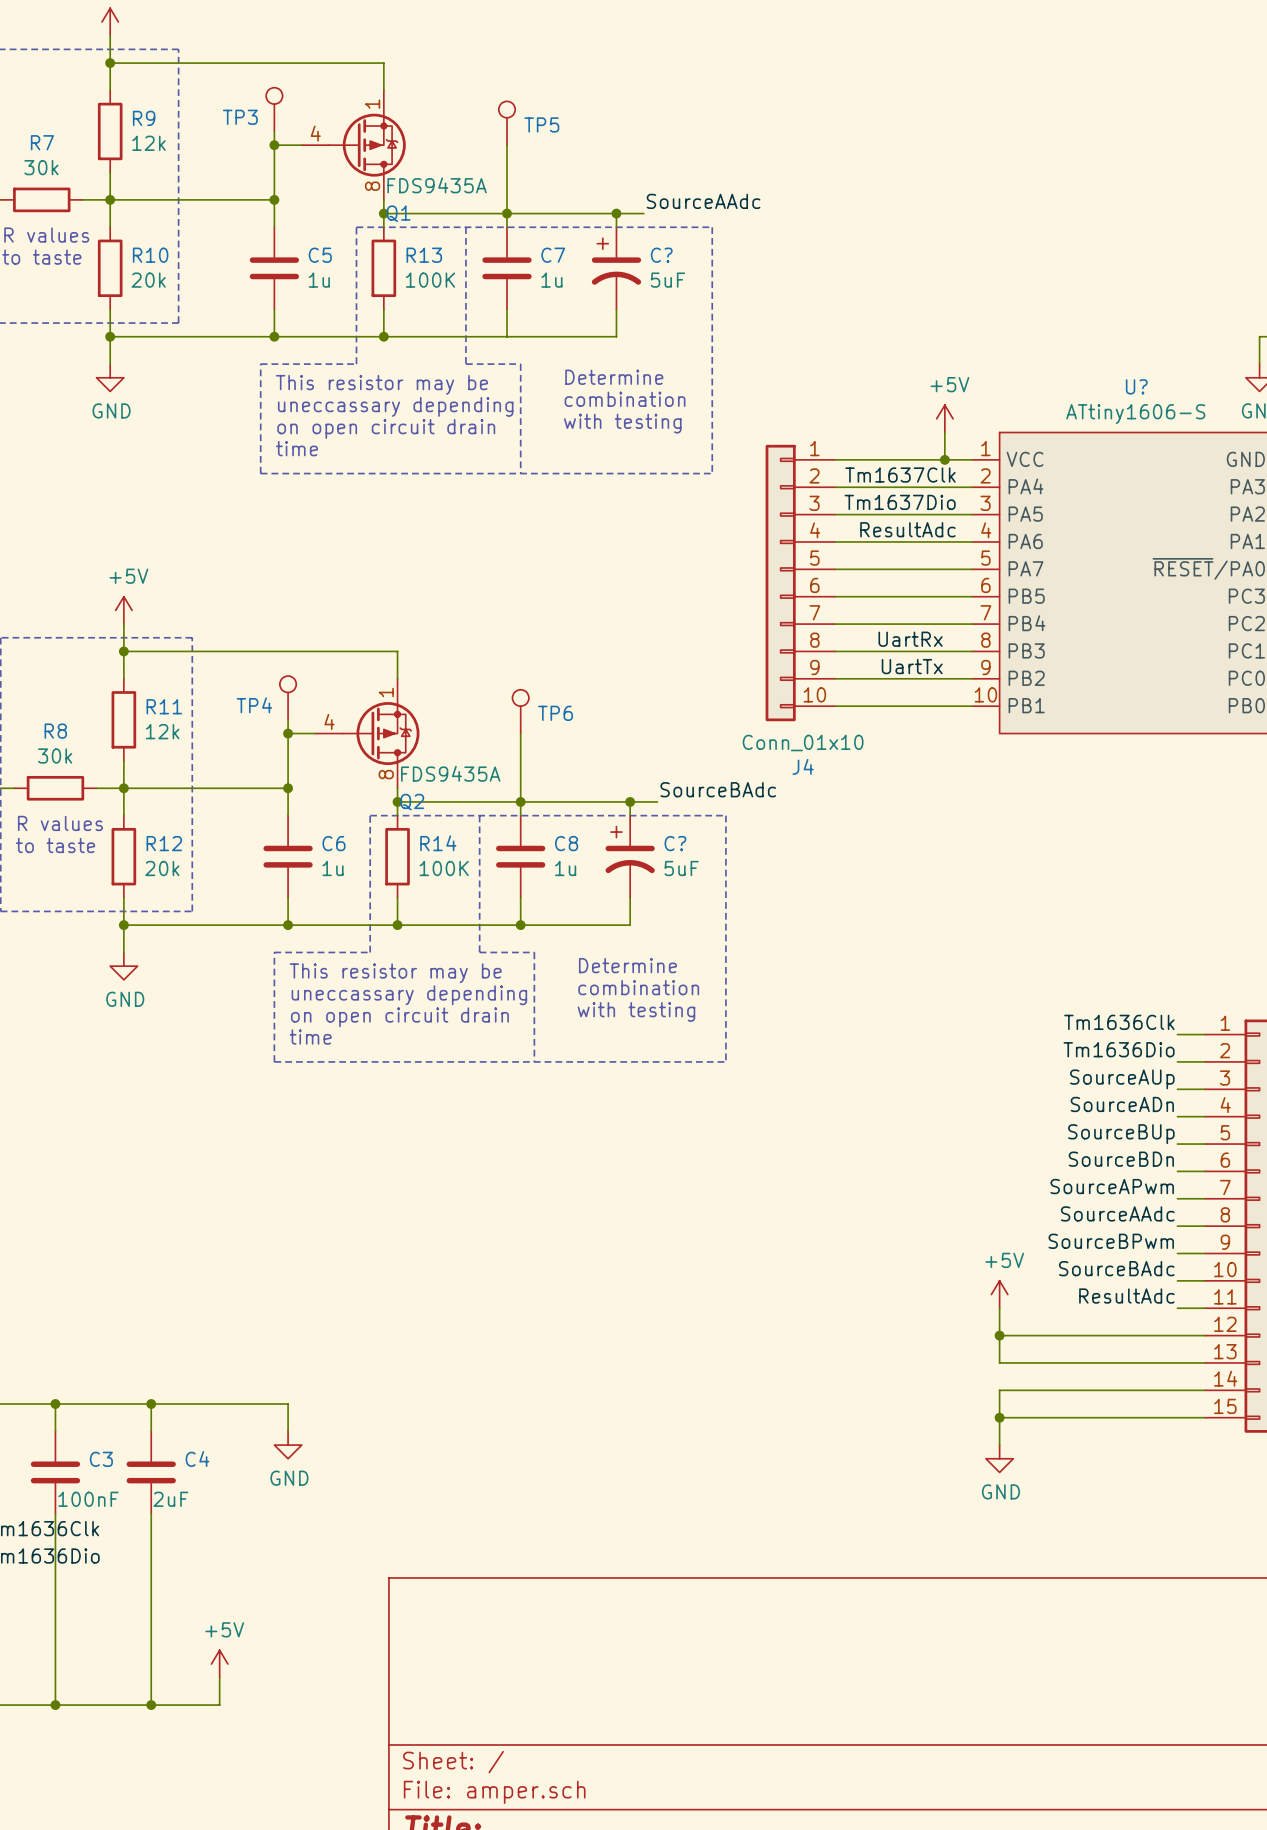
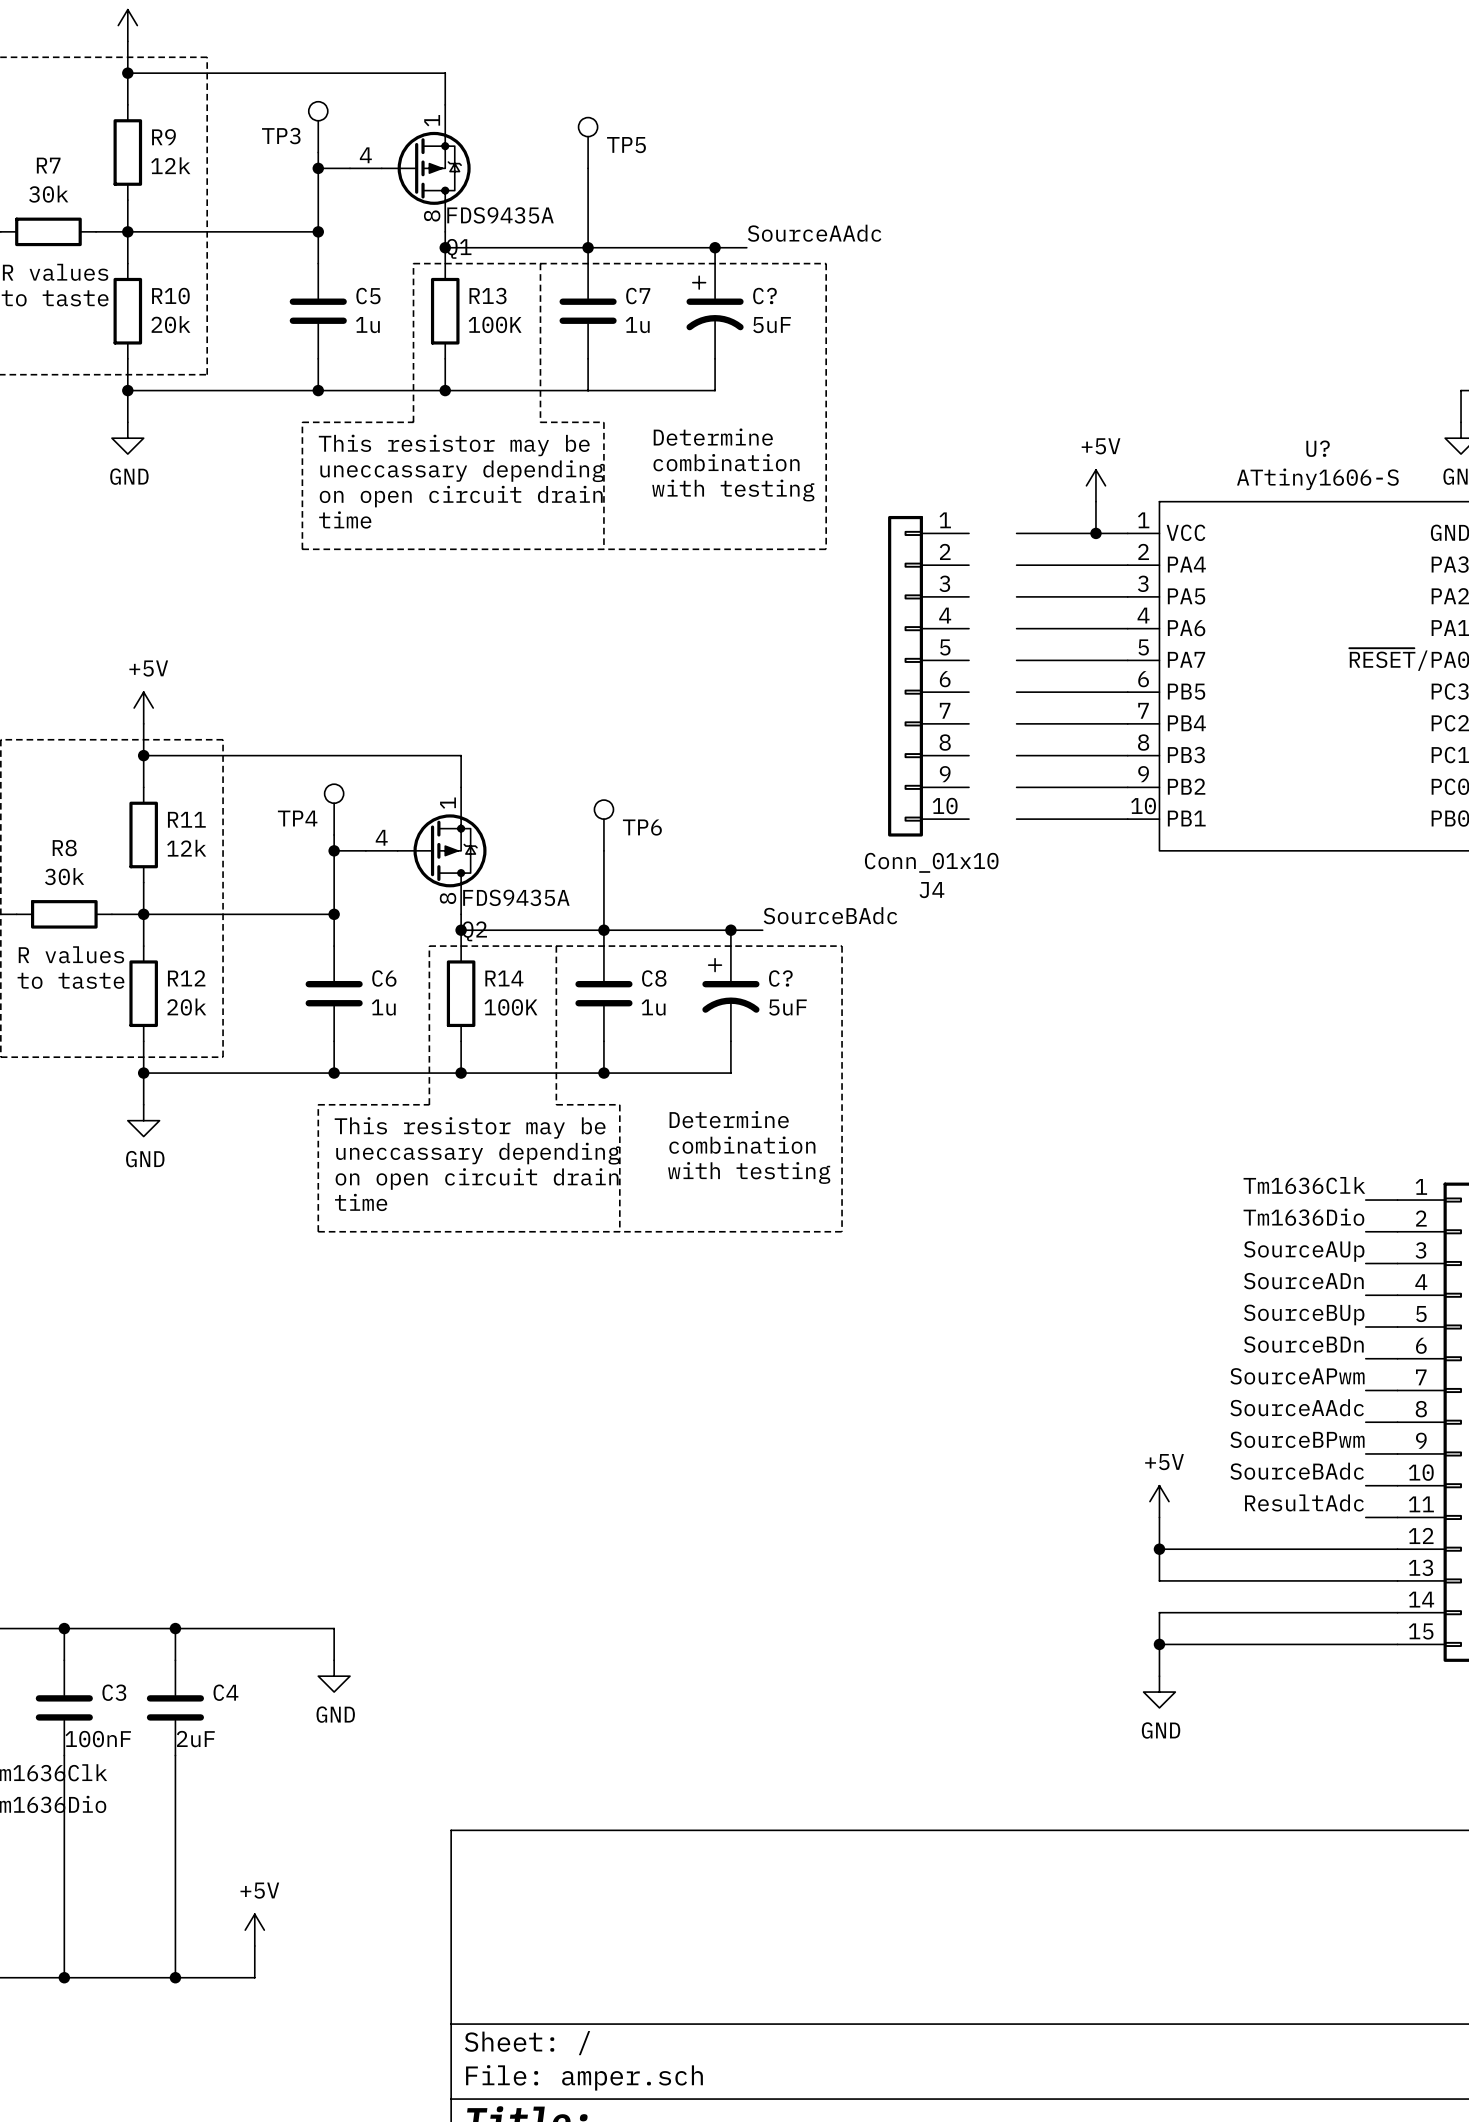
wire: (835, 459) (876, 459) -> none
label: Tm1637Clk (900, 475) -> none
wire: (835, 487) (876, 487) -> none
label: Tm1637Dio (900, 502) -> none
wire: (835, 514) (876, 514) -> none
label: ResultAdc (907, 529) -> none
wire: (835, 541) (876, 541) -> none
wire: (835, 569) (876, 569) -> none
wire: (835, 596) (876, 596) -> none
wire: (835, 624) (876, 624) -> none
label: UartRx (910, 639) -> none
wire: (835, 651) (876, 651) -> none
label: UartTx (912, 666) -> none
wire: (835, 678) (876, 678) -> none
wire: (835, 706) (876, 706) -> none

